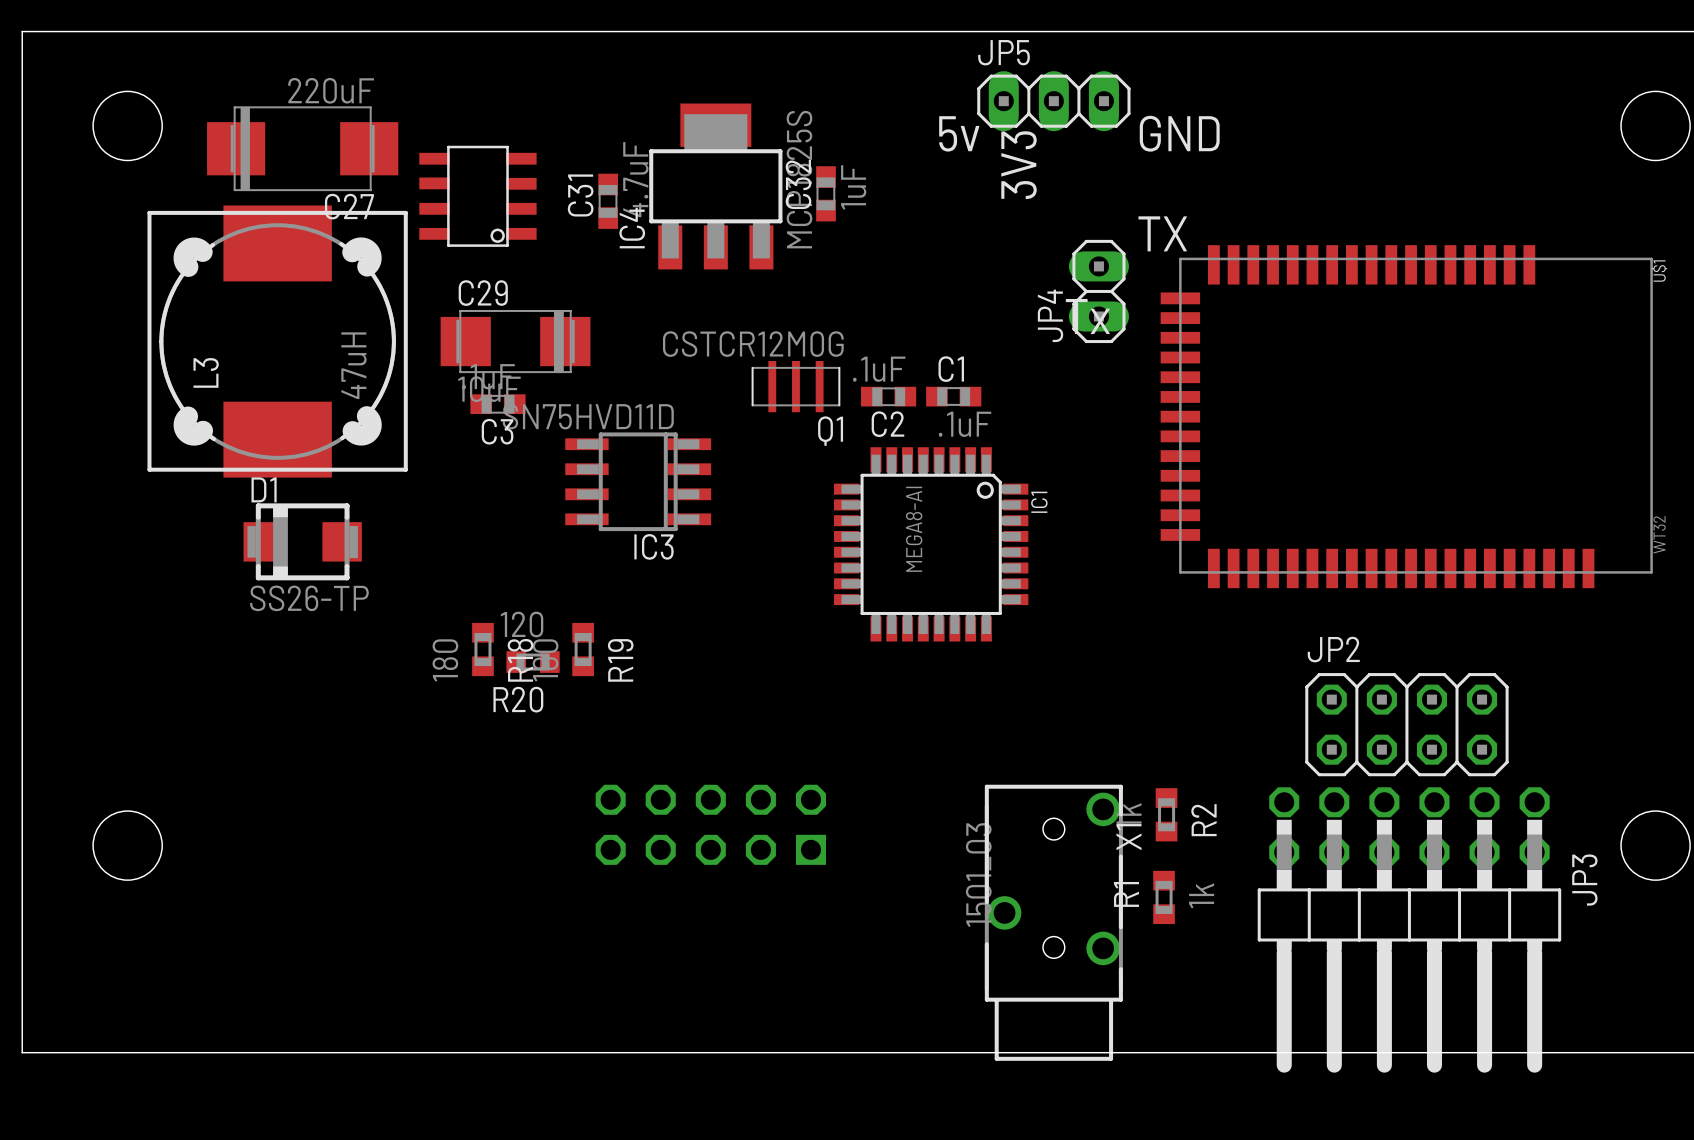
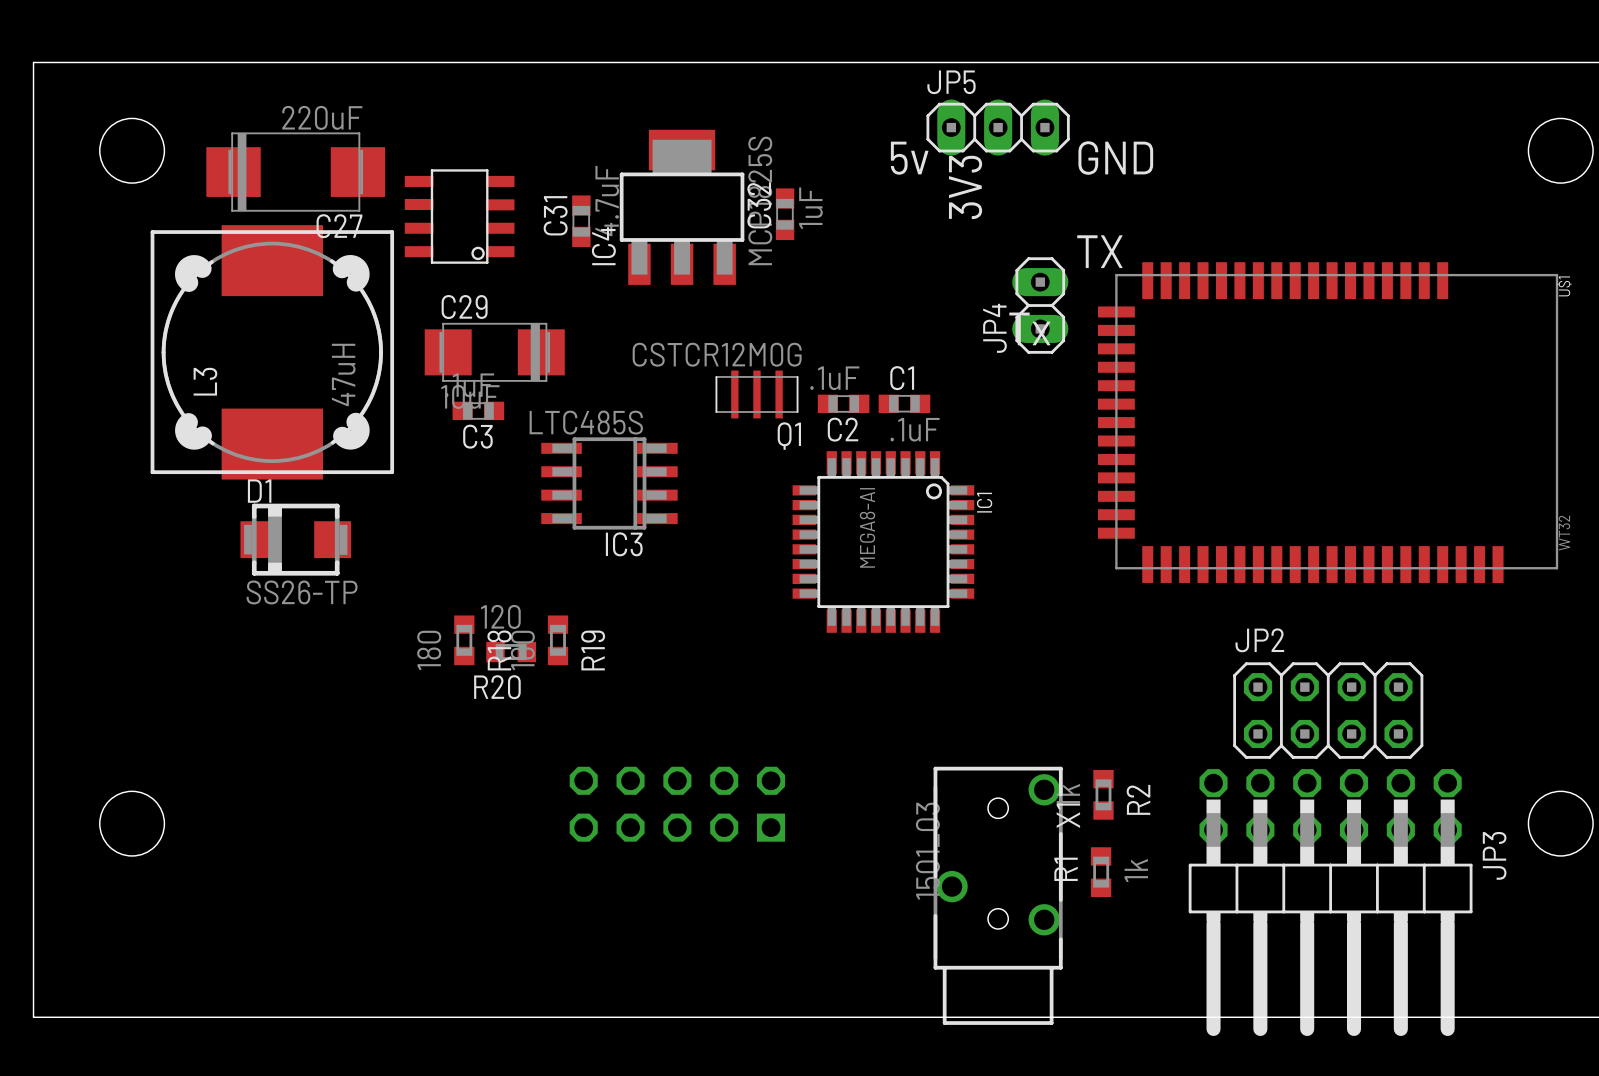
IC3 value: SN75HVD11D (588, 416) -> LTC485S (586, 422)

